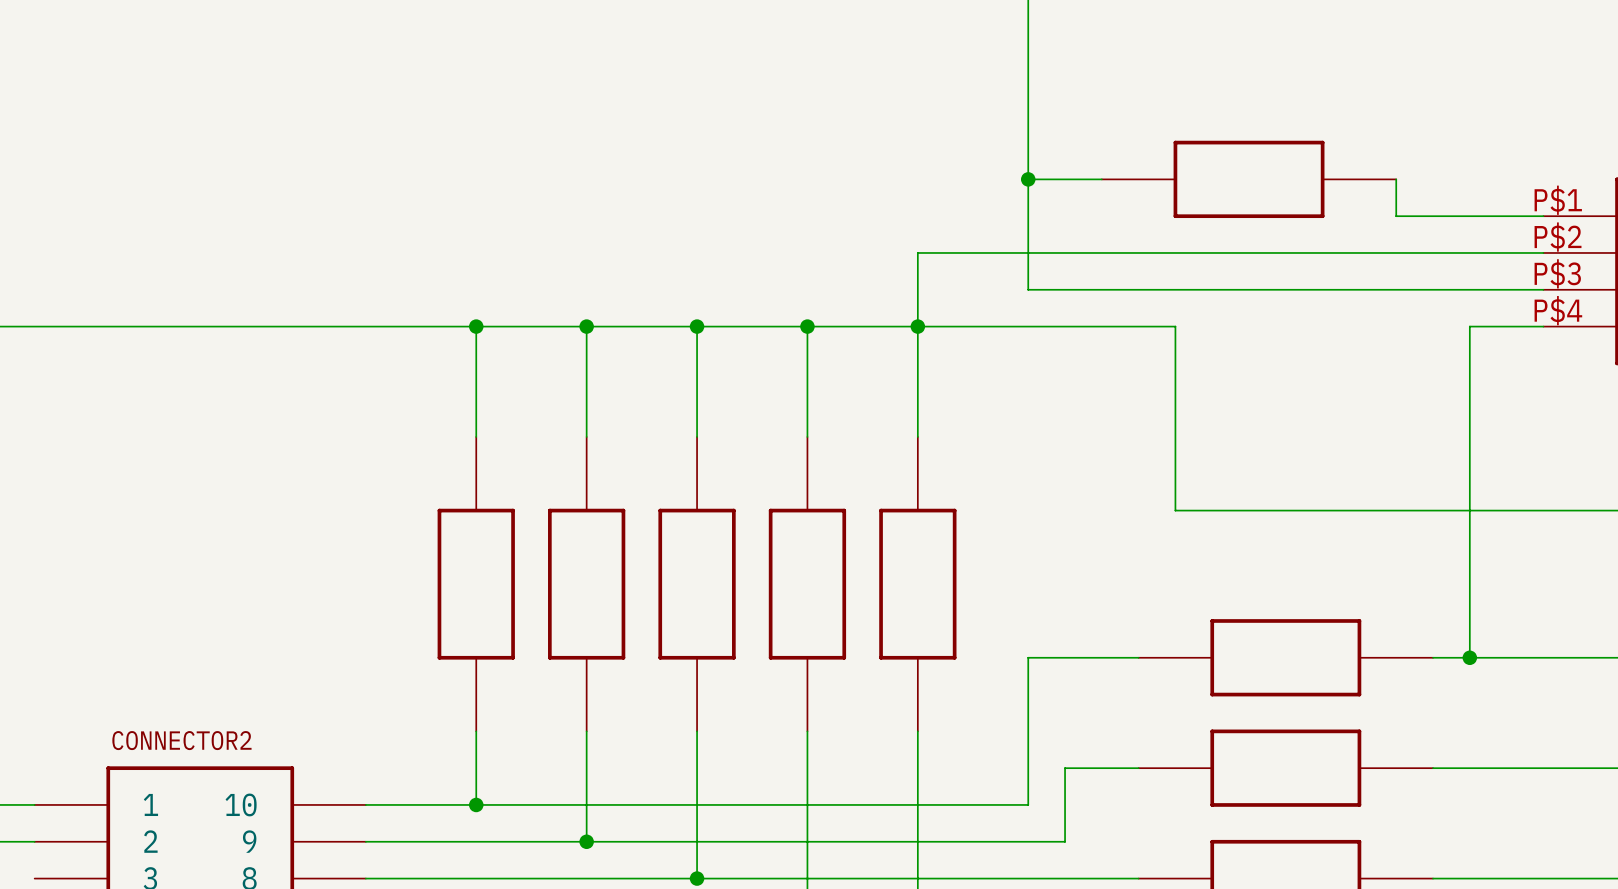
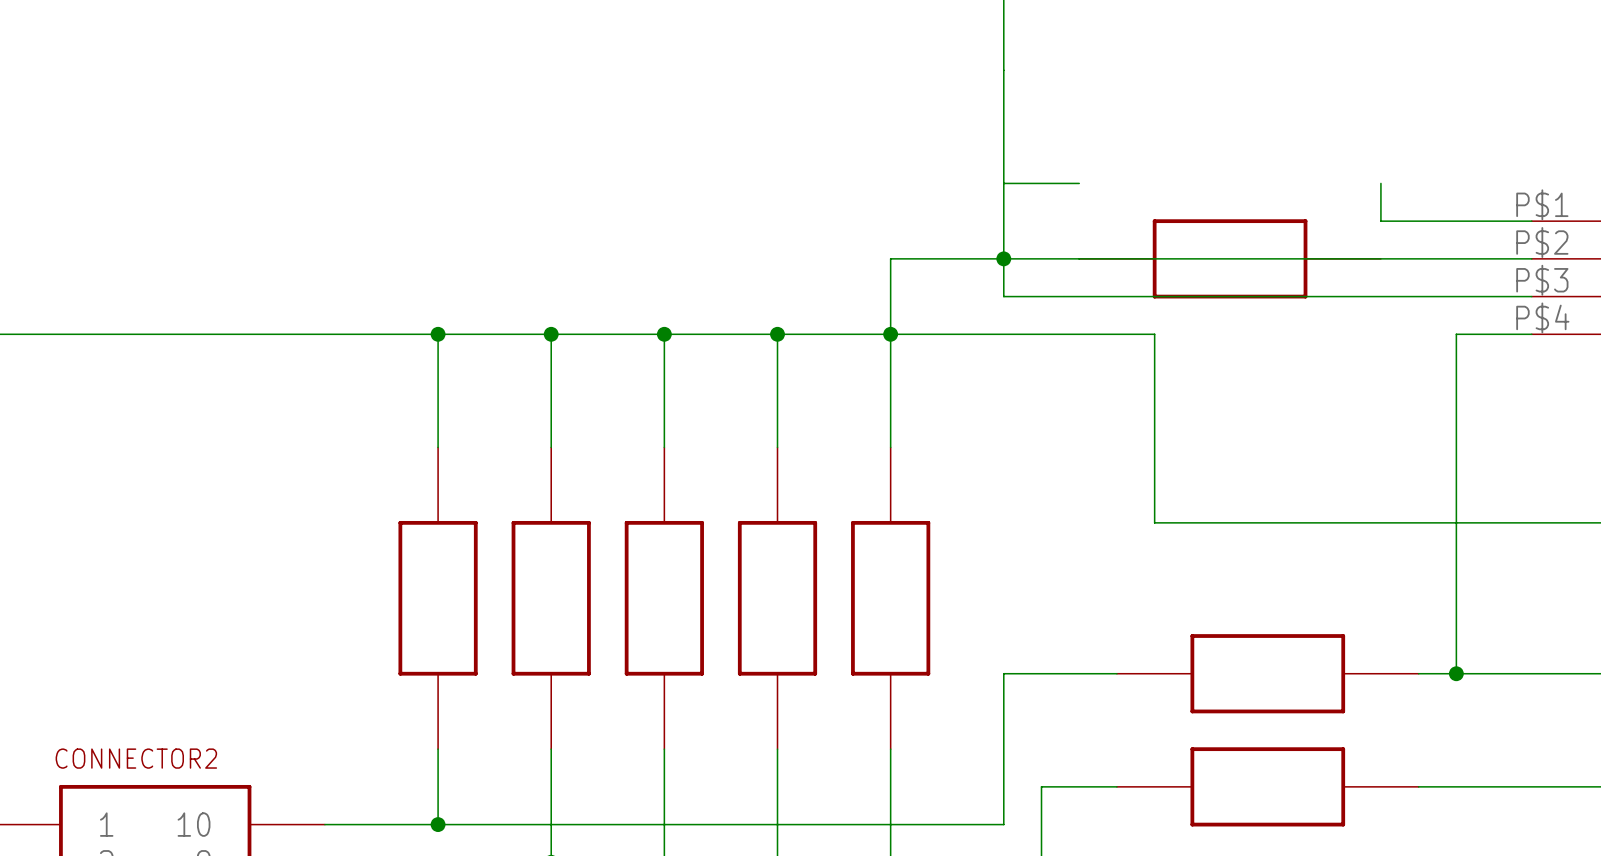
junction position: (1028, 179) -> (1003, 258)
part position: (1249, 179) -> (1230, 258)

